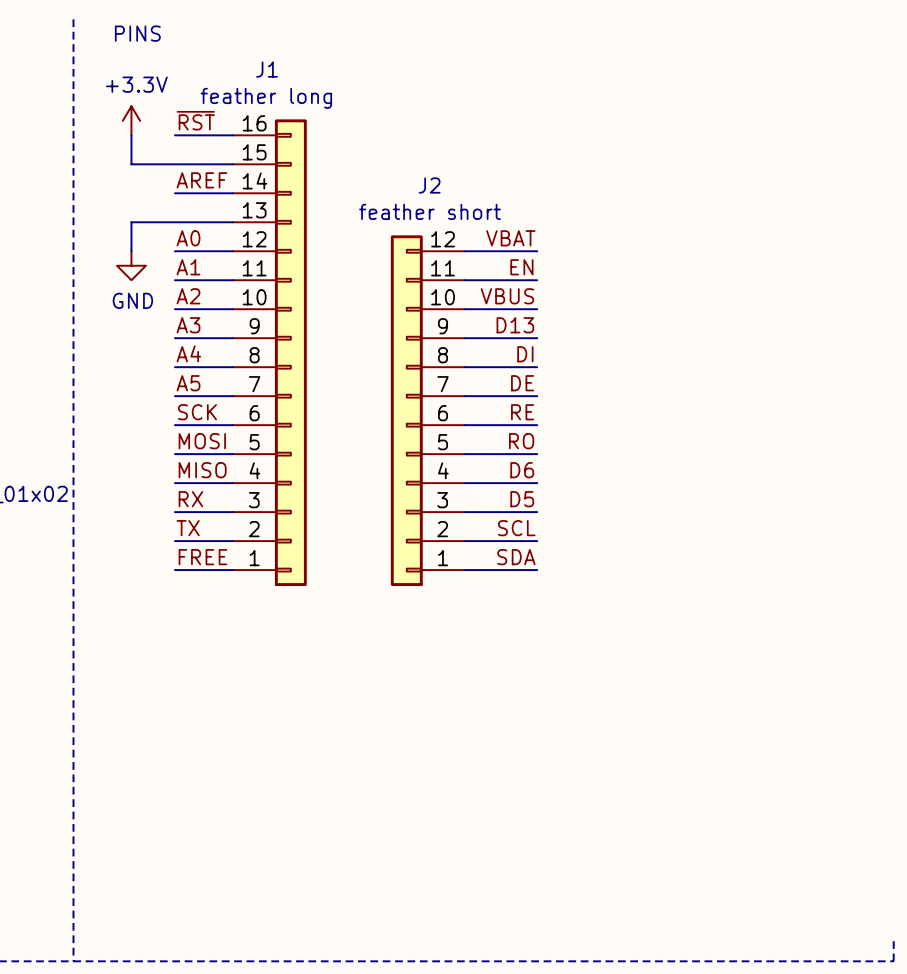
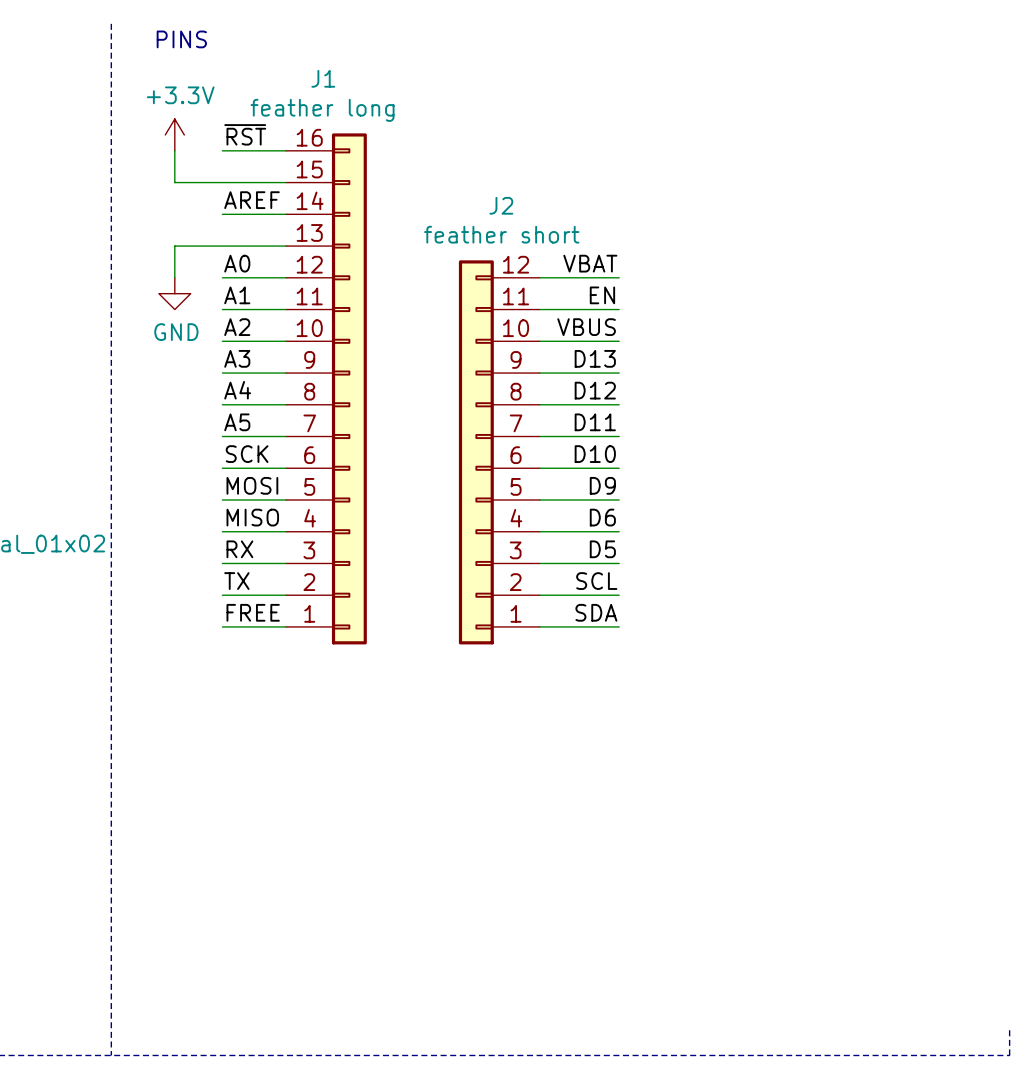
label: DI (525, 354) -> D12 (595, 390)
label: DE (522, 383) -> D11 (595, 422)
label: RE (522, 412) -> D10 (595, 454)
label: RO (521, 441) -> D9 (602, 485)

